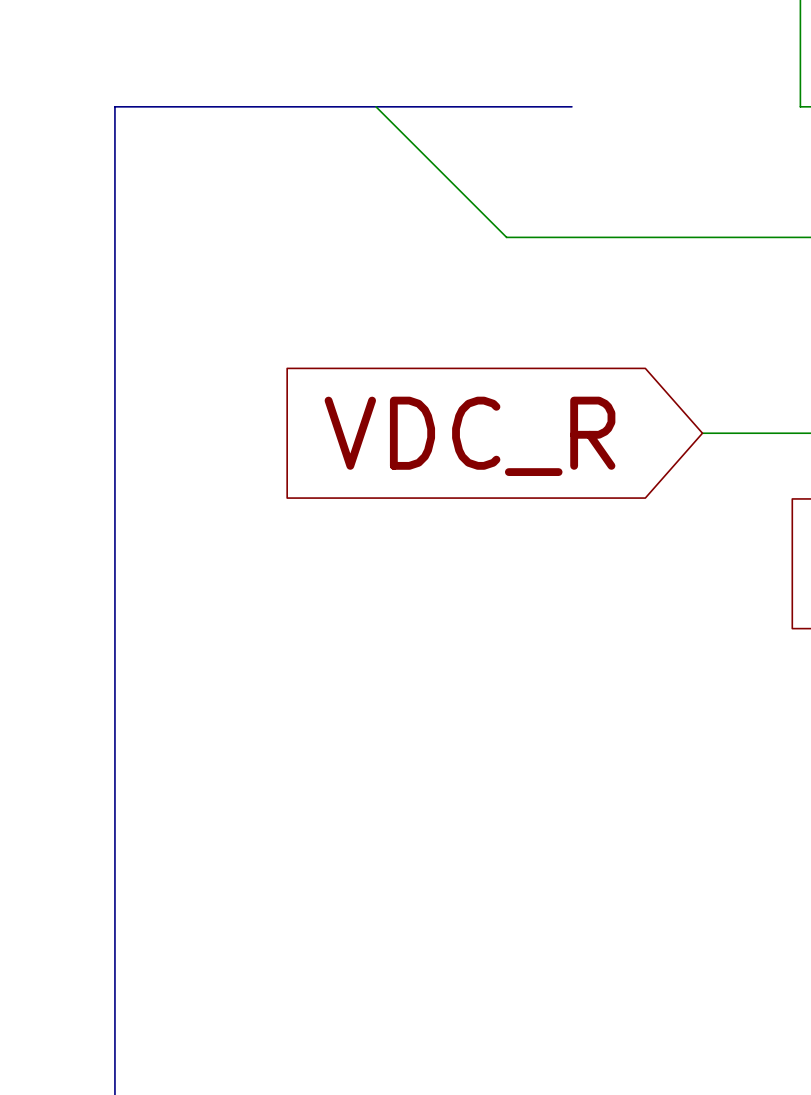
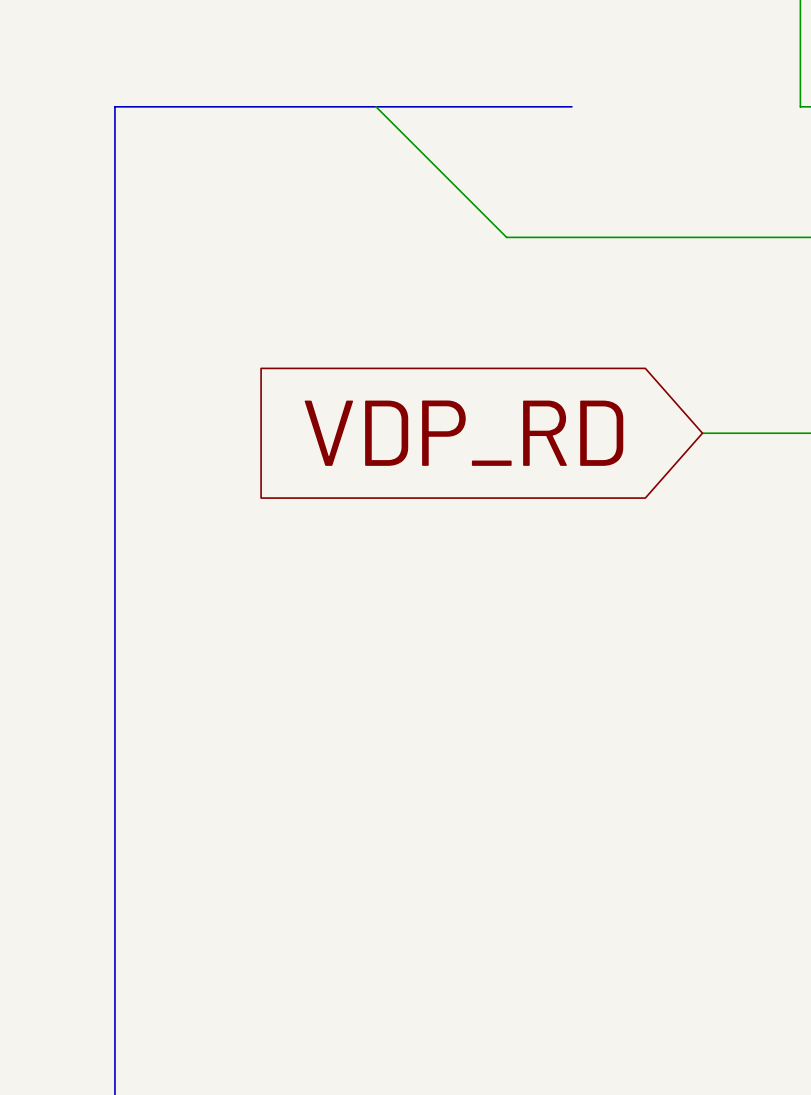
global label: VDC_R (470, 436) -> VDP_RD (463, 433)

